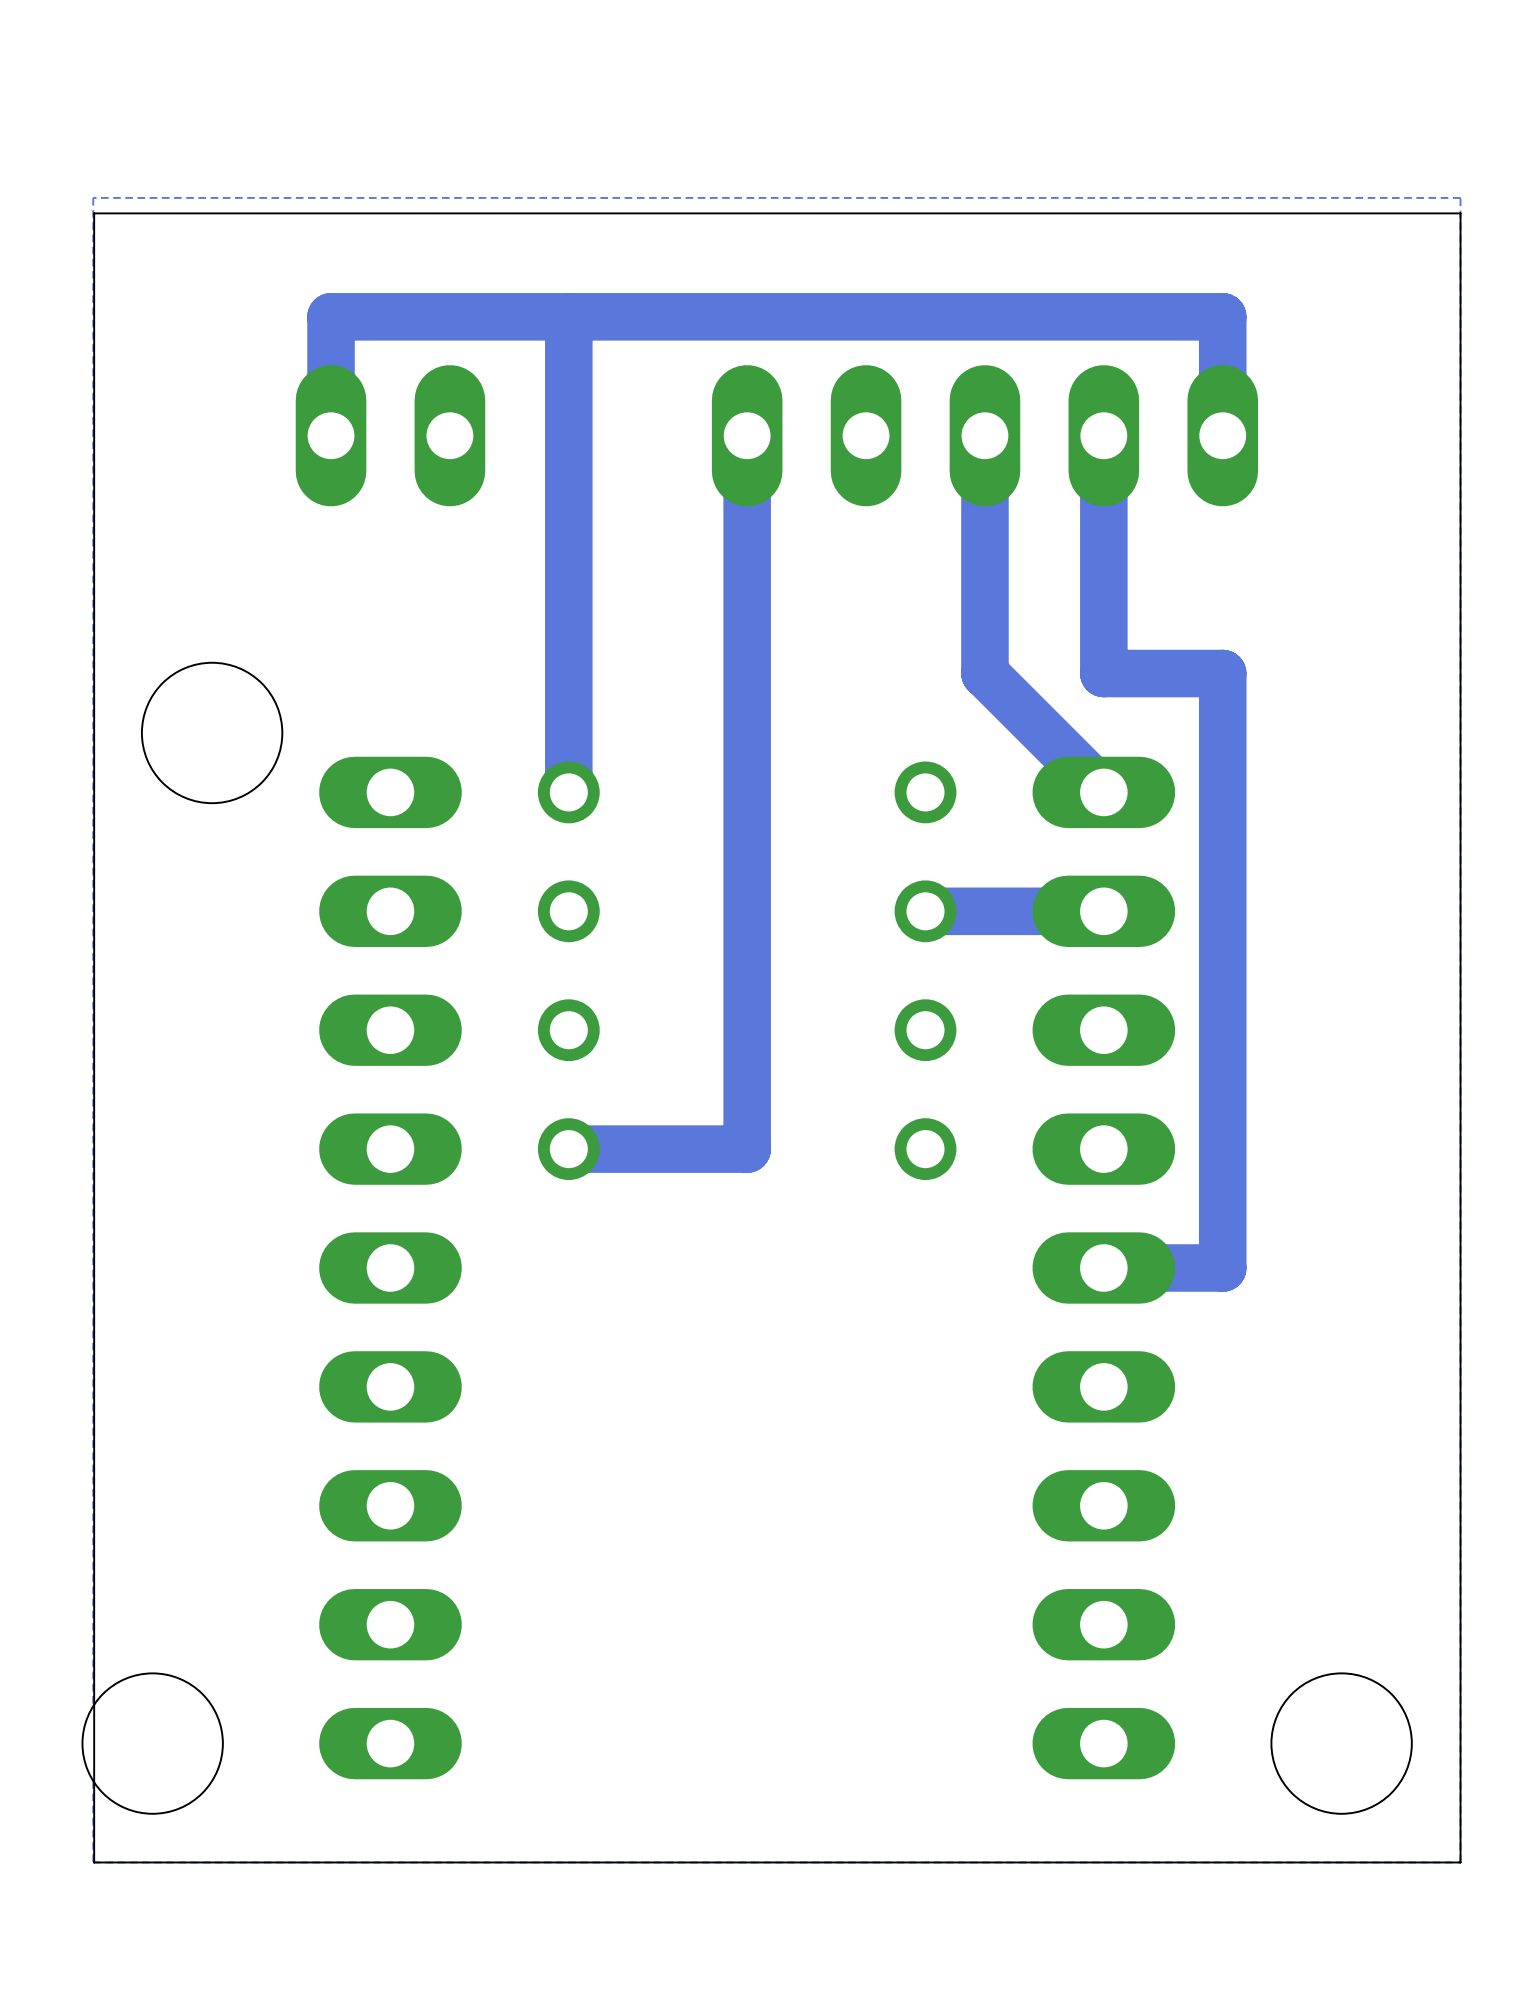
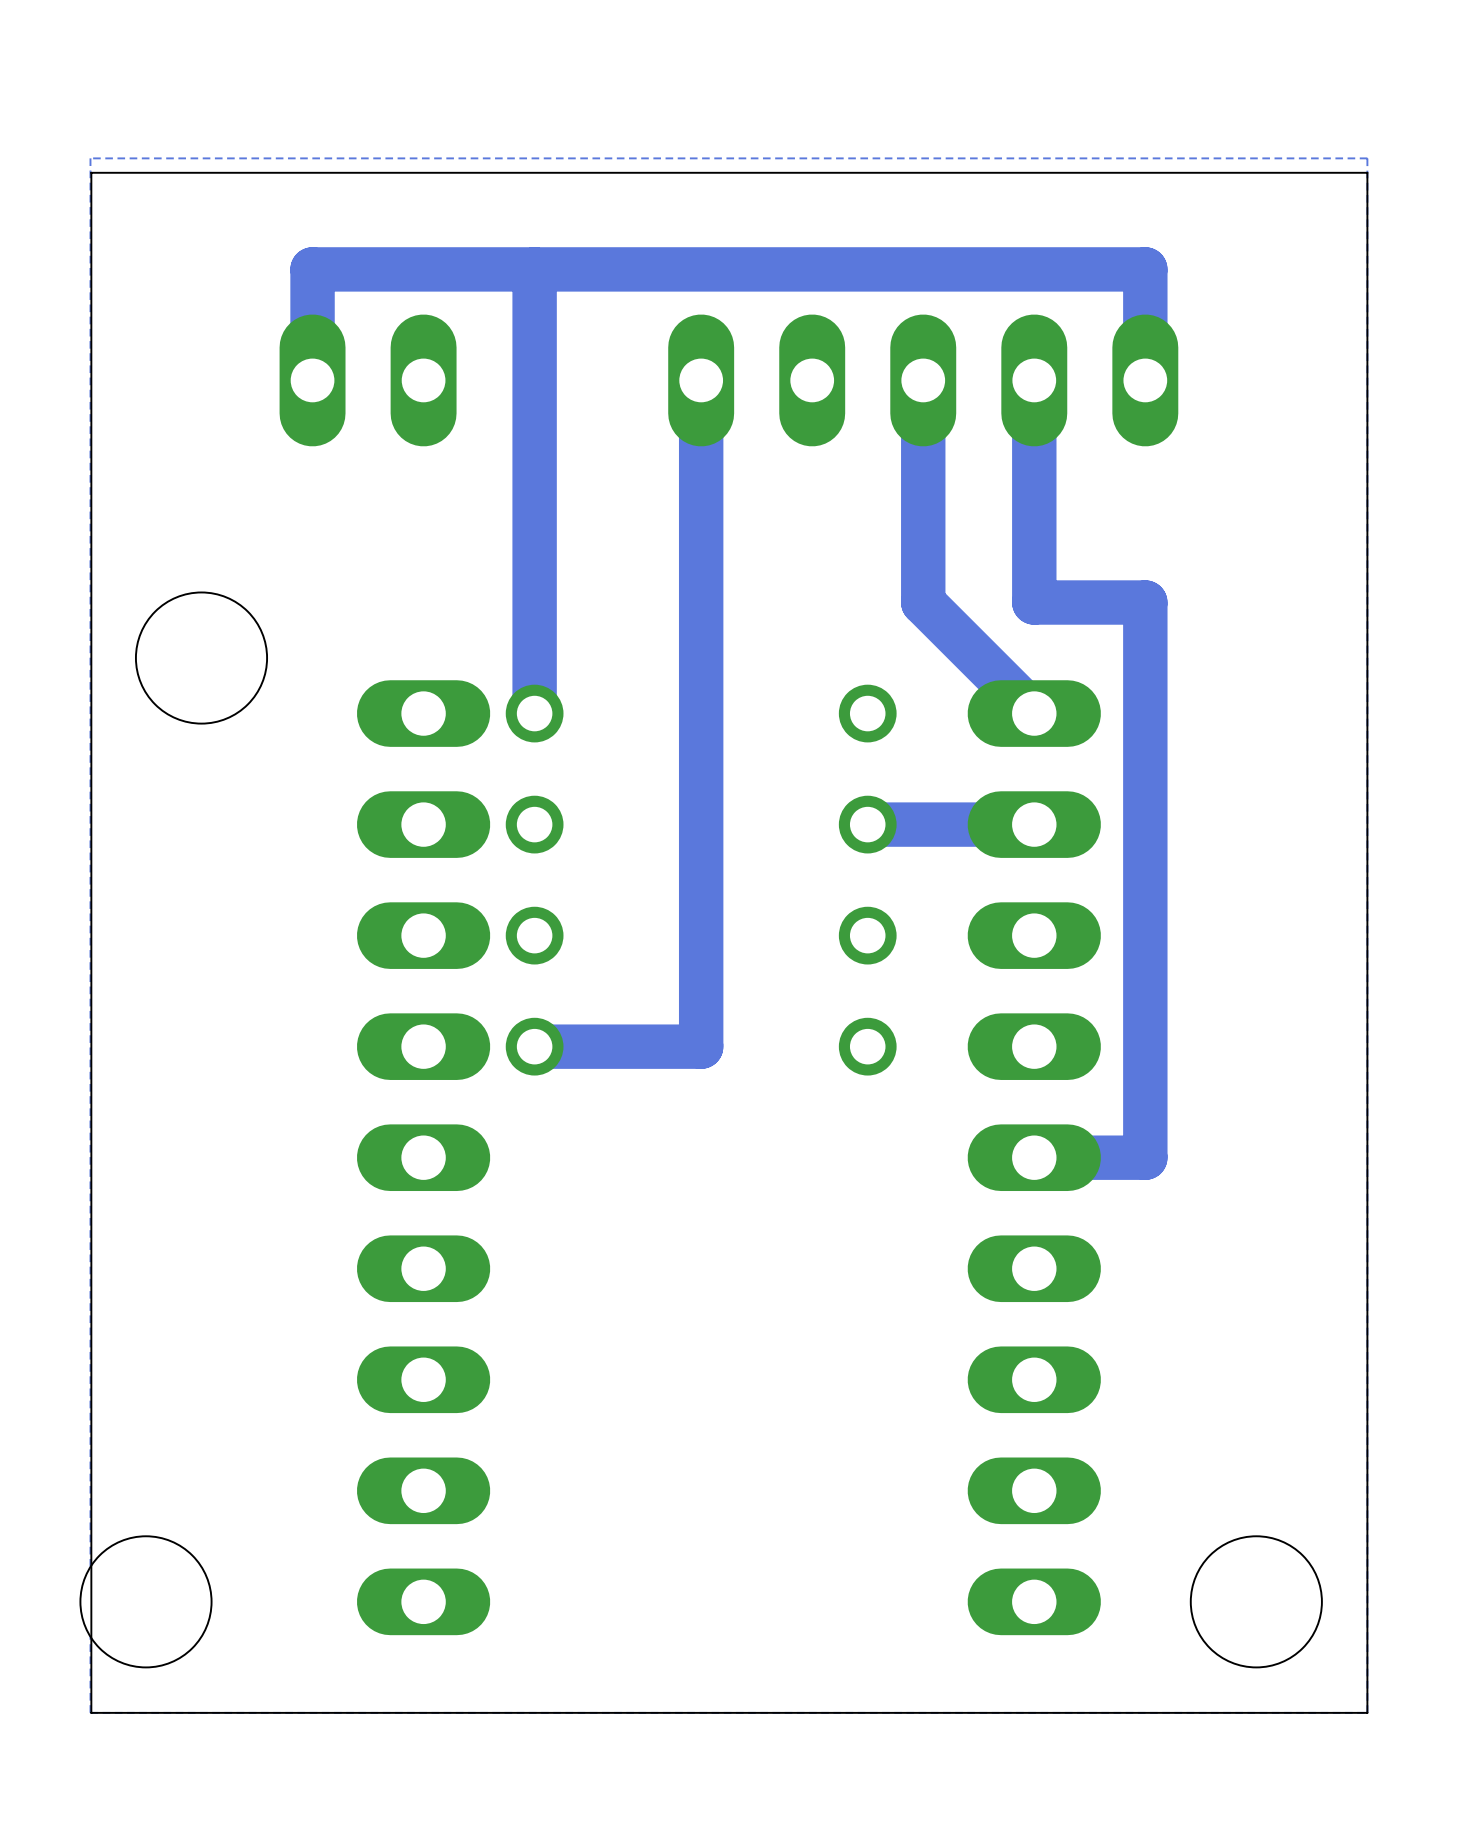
part position: (390, 1268) -> (423, 1157)

